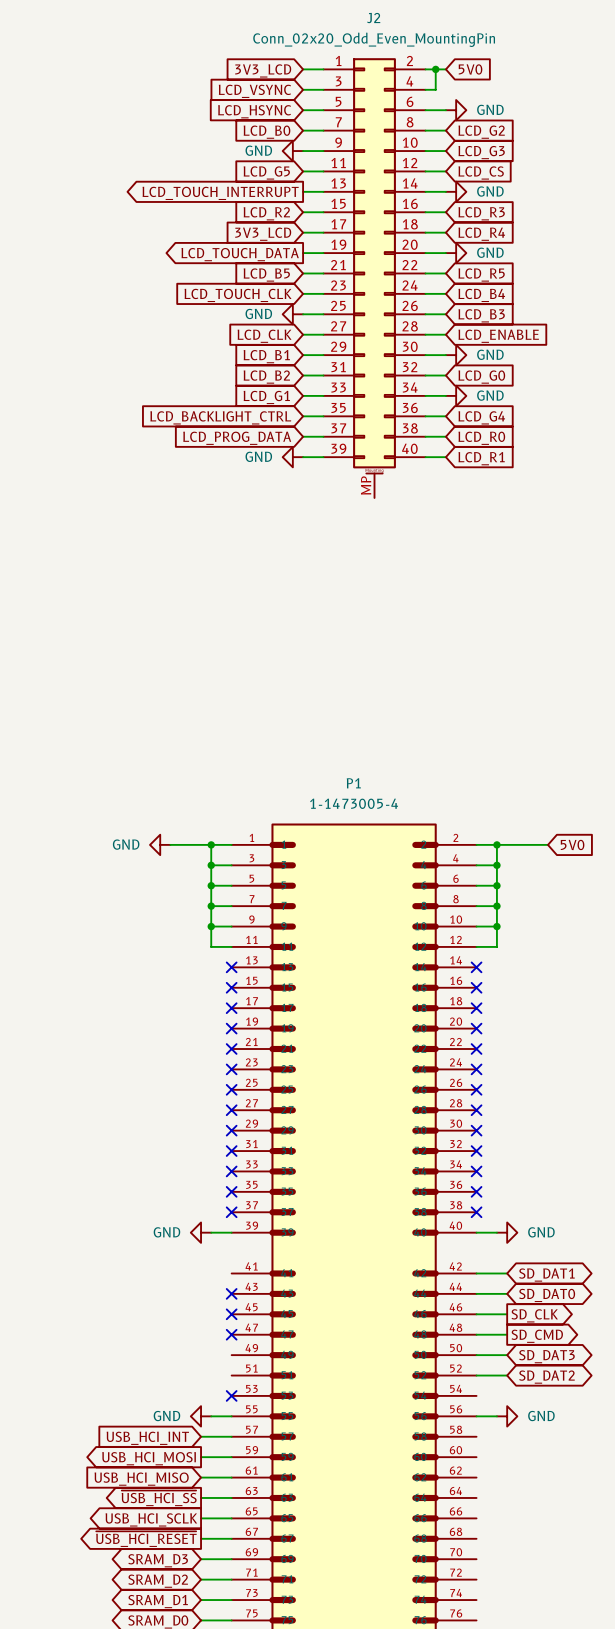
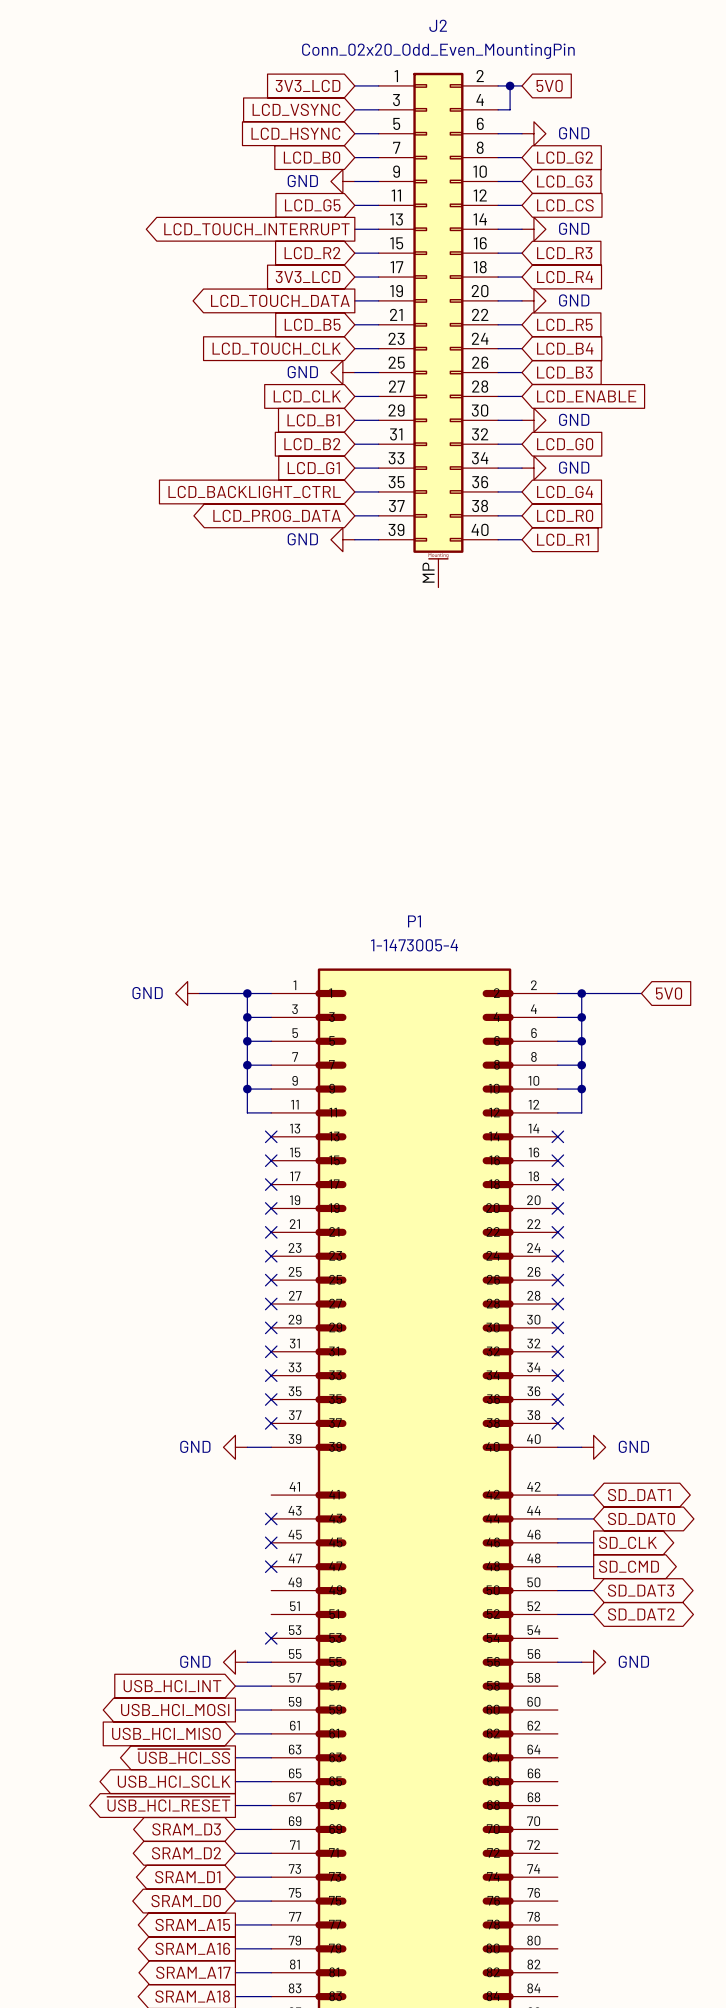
global label shape: input (237, 438) -> bidirectional (277, 515)

